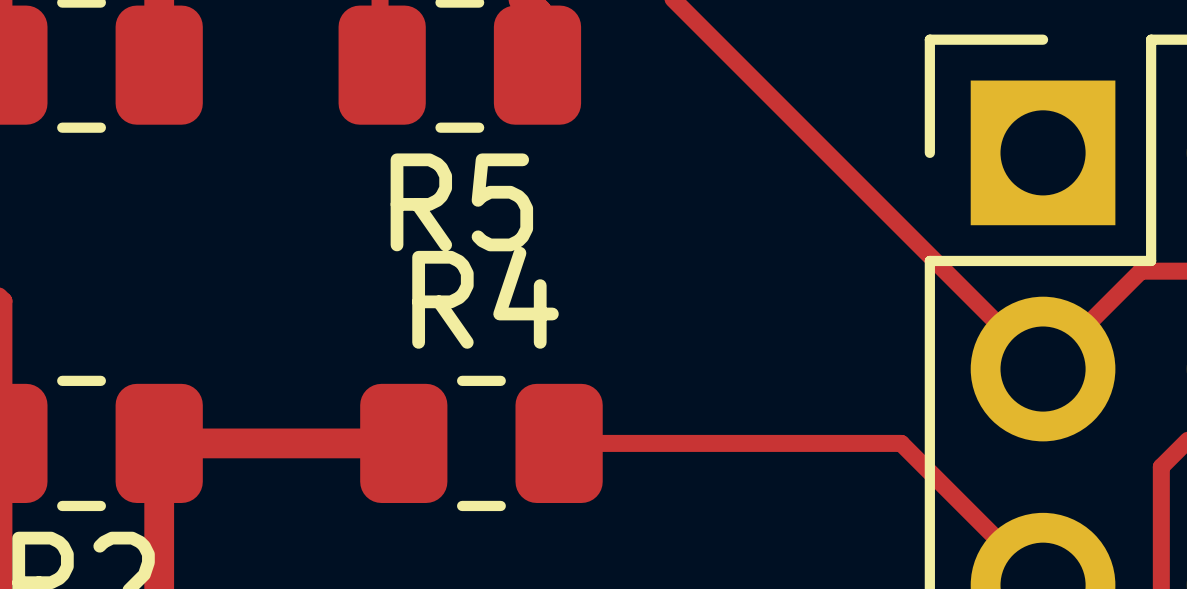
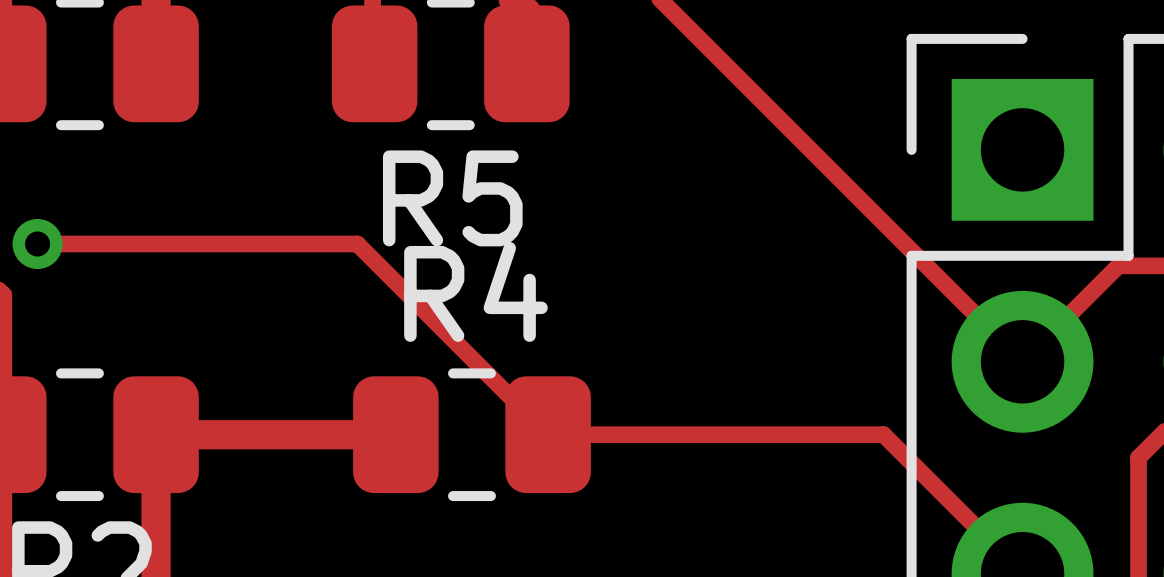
track: none -> (37, 243) (357, 243) (548, 434)
via: none -> (37, 243)

